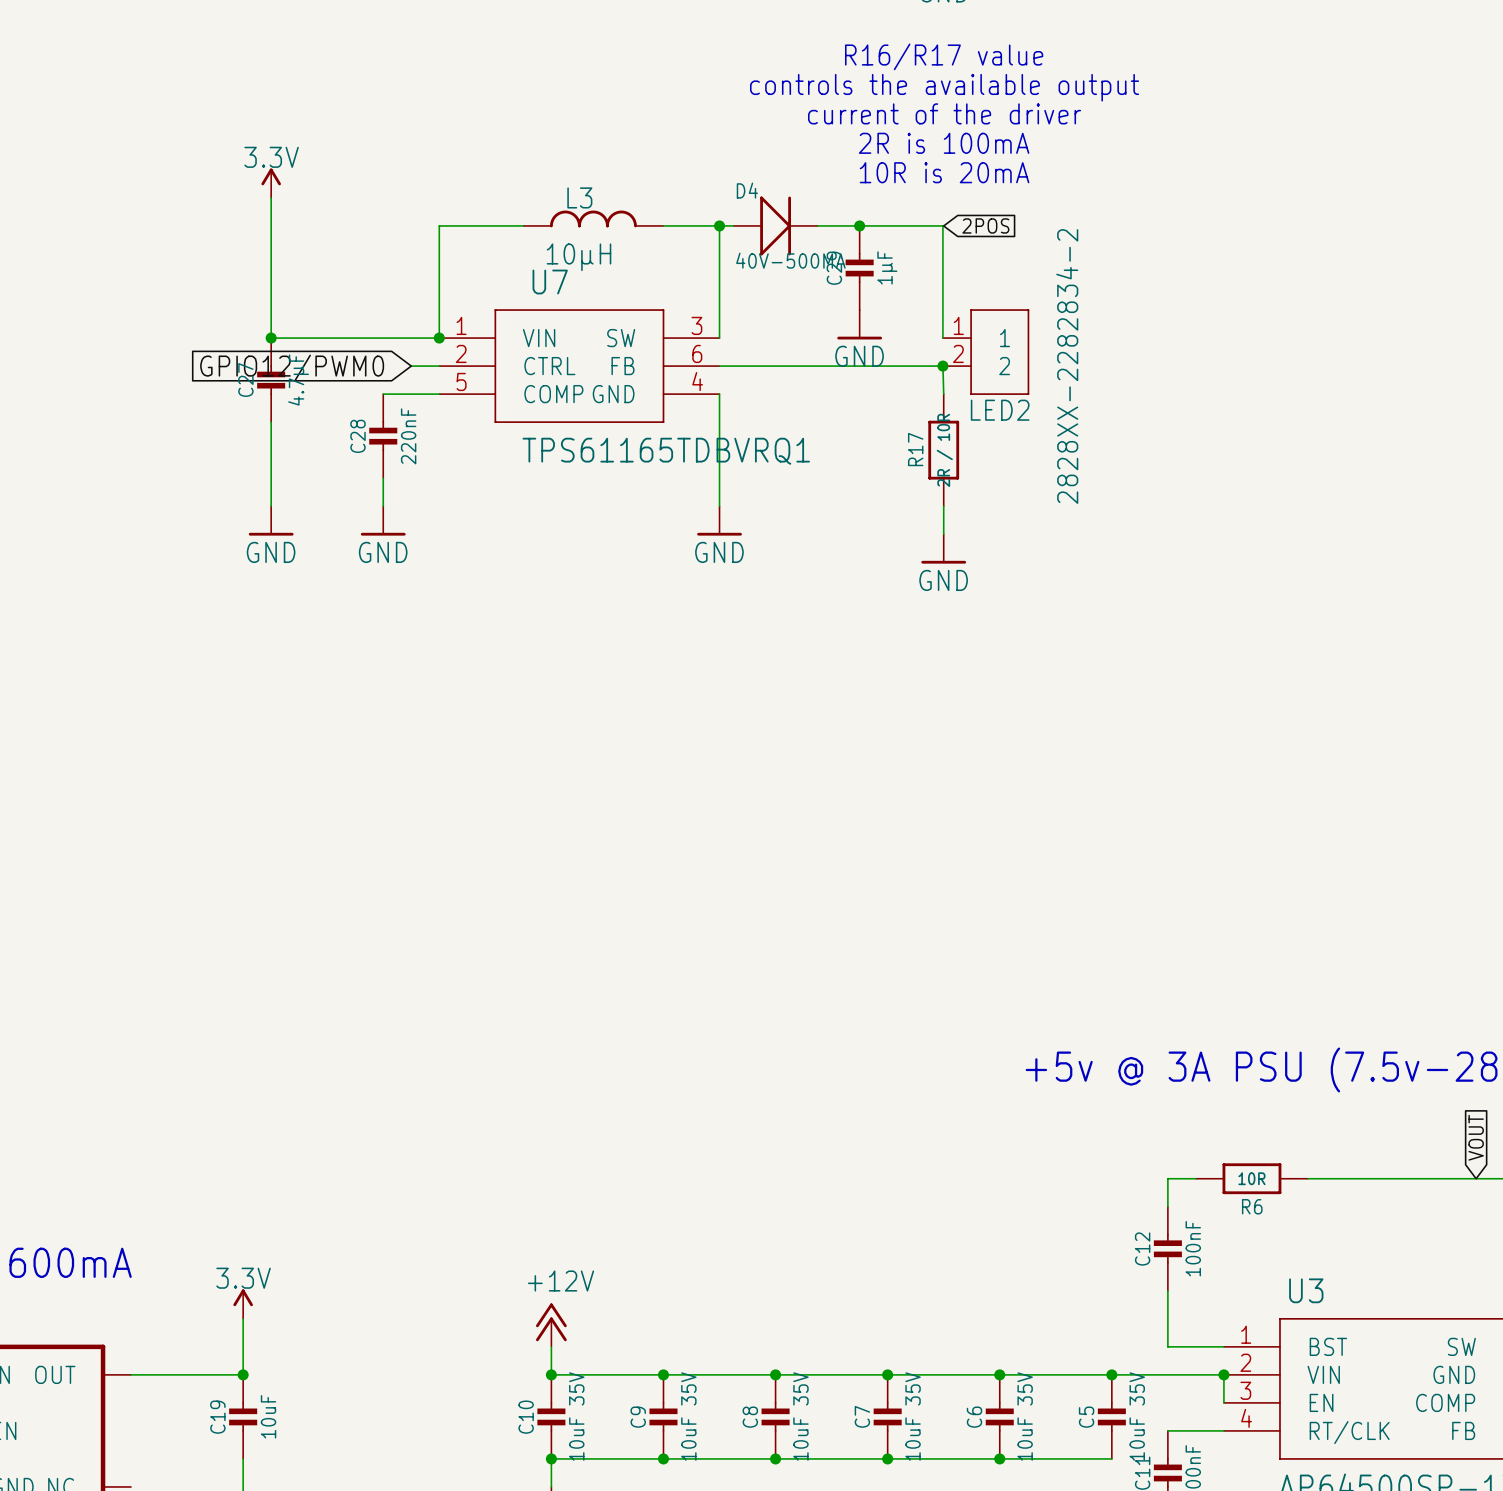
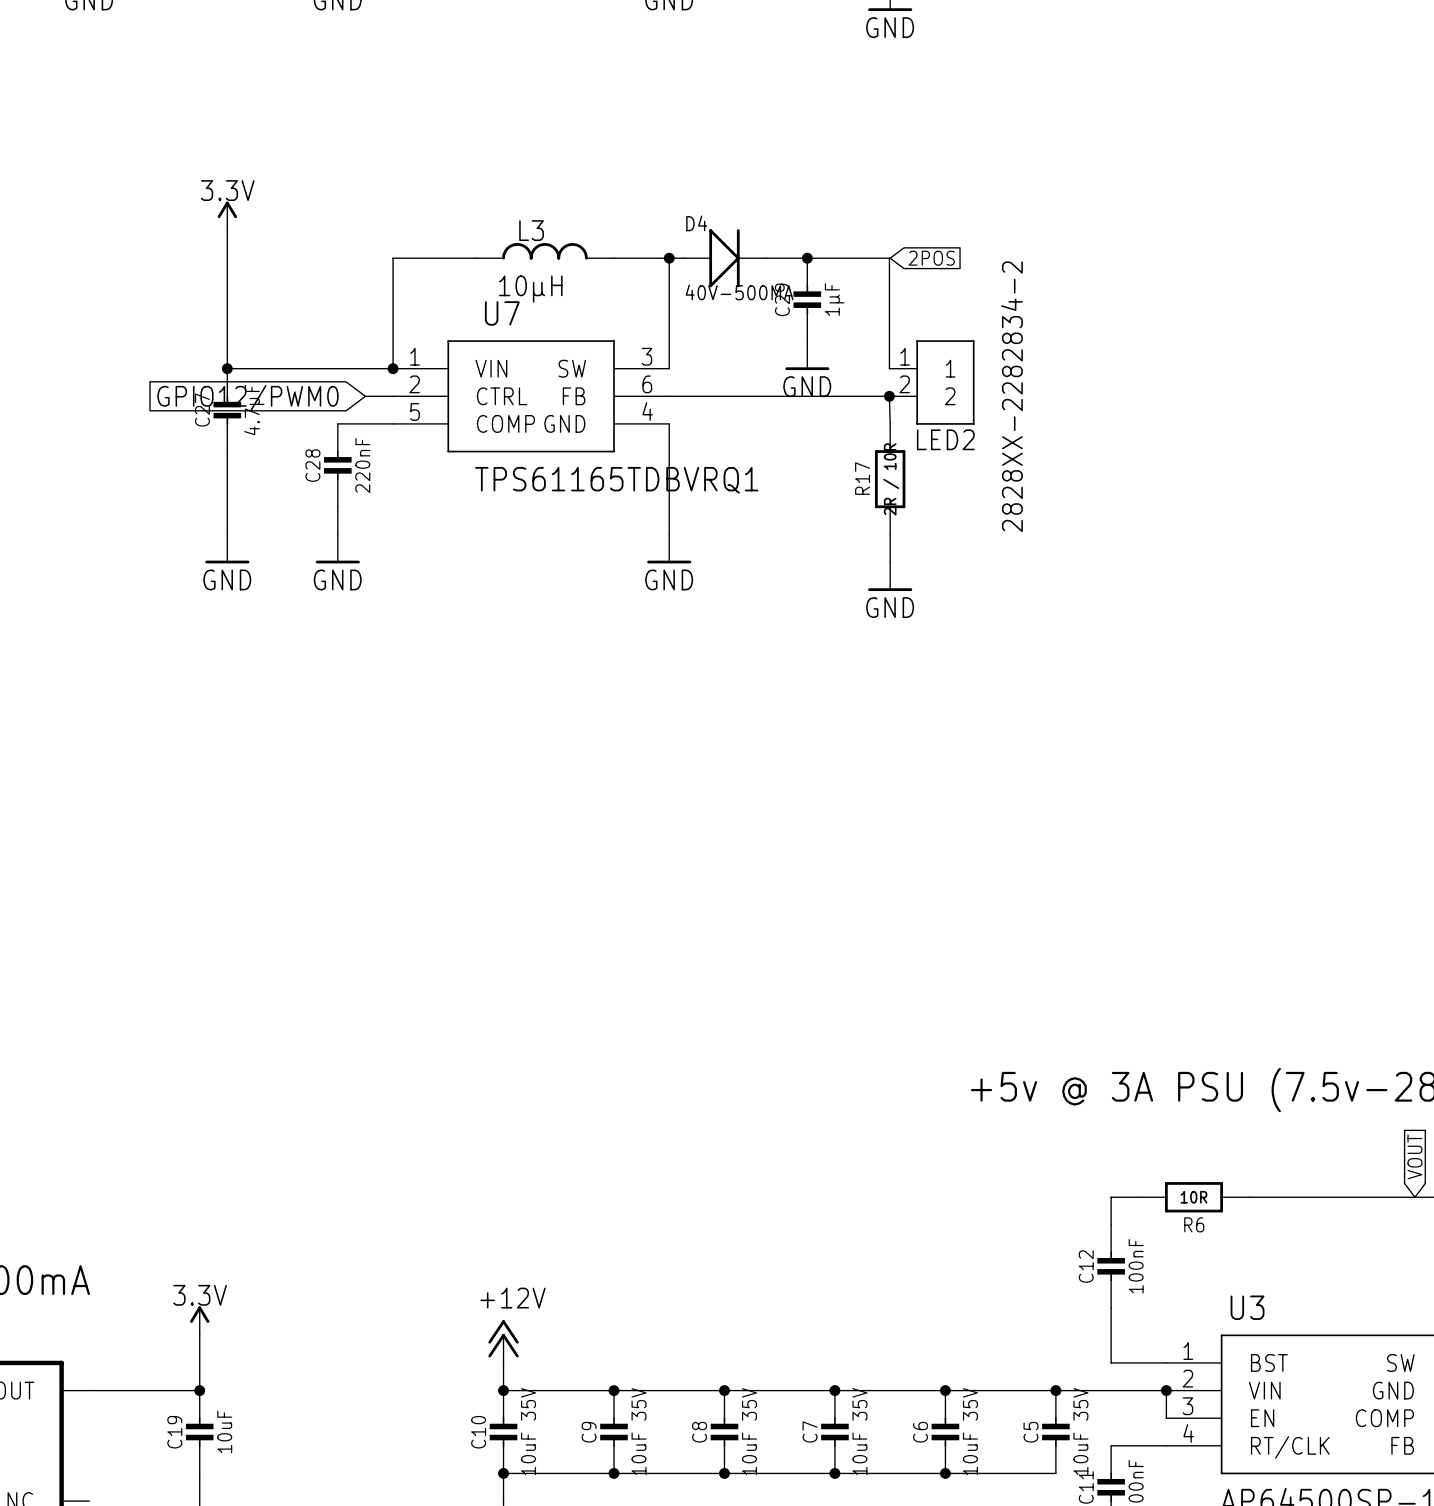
text: R16/R17 value (944, 56) -> none
text: controls the available output (944, 87) -> none
text: current of the driver (944, 113) -> none
text: 2R is 100mA (944, 143) -> none
text: 10R is 20mA (944, 172) -> none

